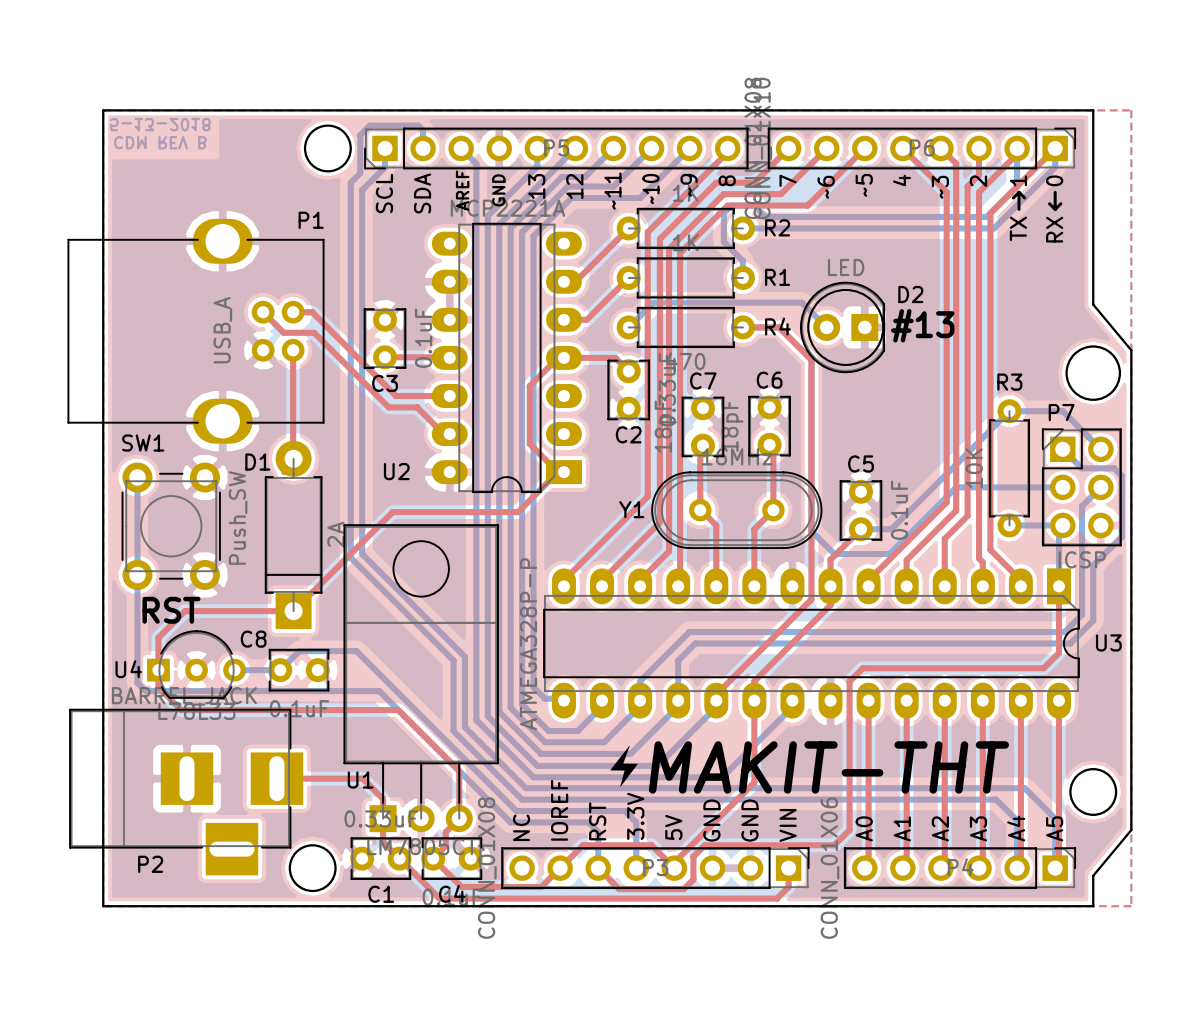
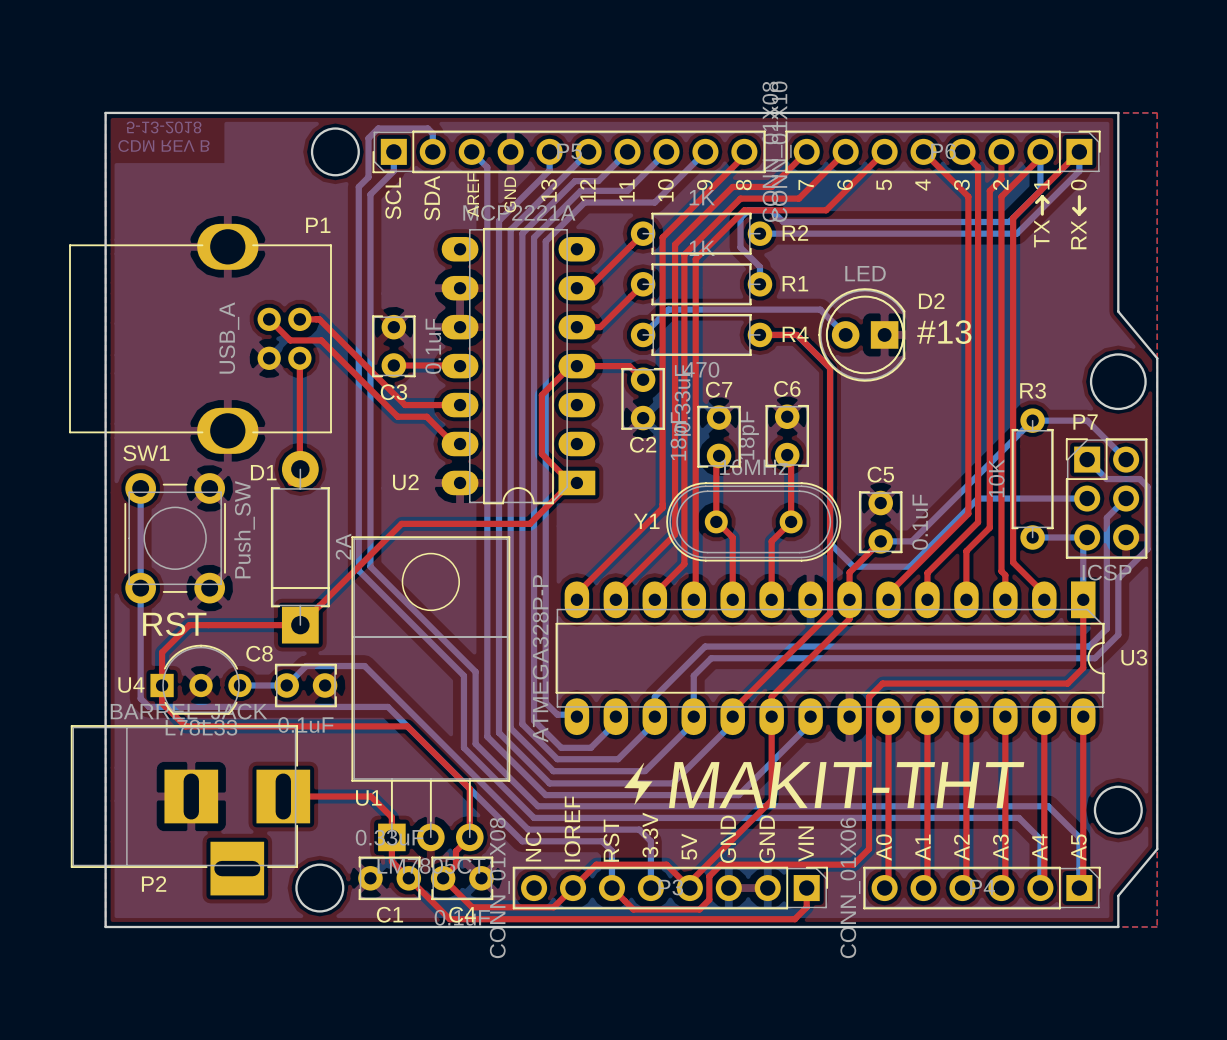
text: ~9 (689, 185) -> 9 (704, 184)
text: ~5 (864, 185) -> 5 (884, 185)
text: ~6 (826, 187) -> 6 (845, 184)
text: ~3 (940, 187) -> 3 (961, 185)
text: ~10 (650, 189) -> 10 (665, 190)
text: ~11 (612, 191) -> 11 (626, 190)

